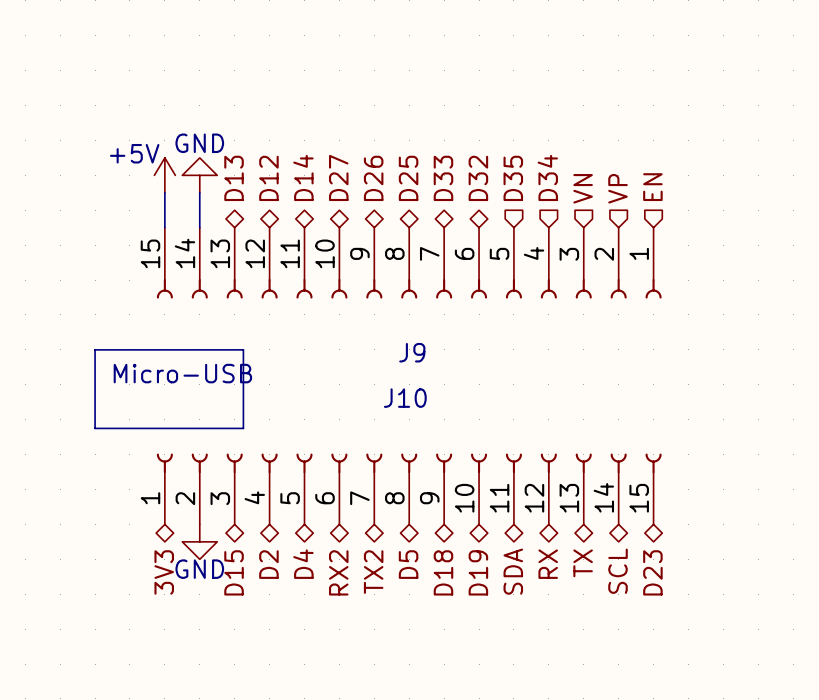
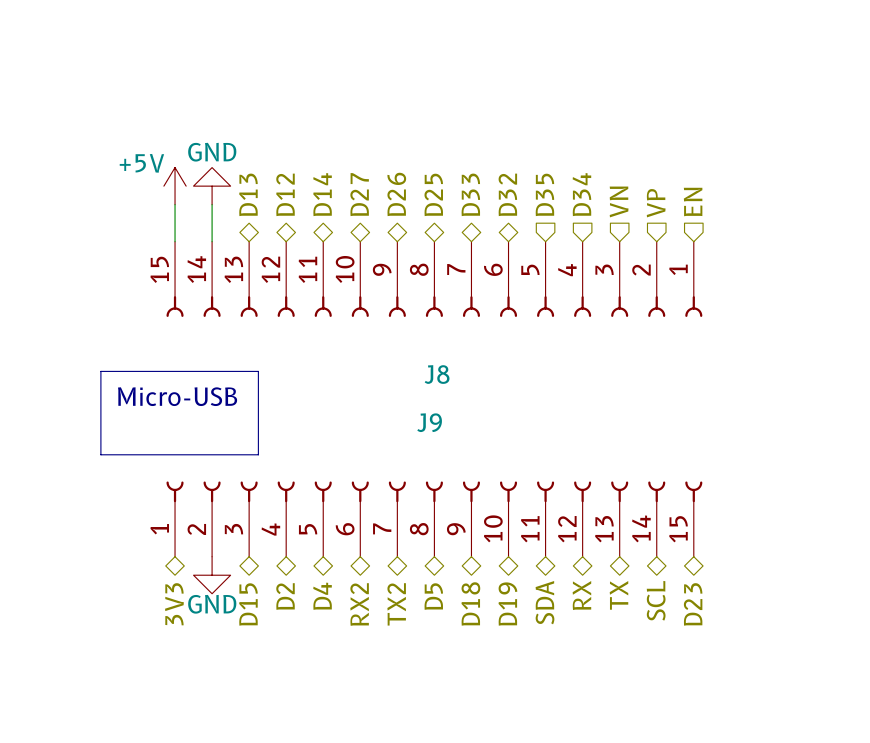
J9 name: J9 (412, 352) -> J8 (437, 374)
J10 name: J10 (405, 398) -> J9 (429, 422)

